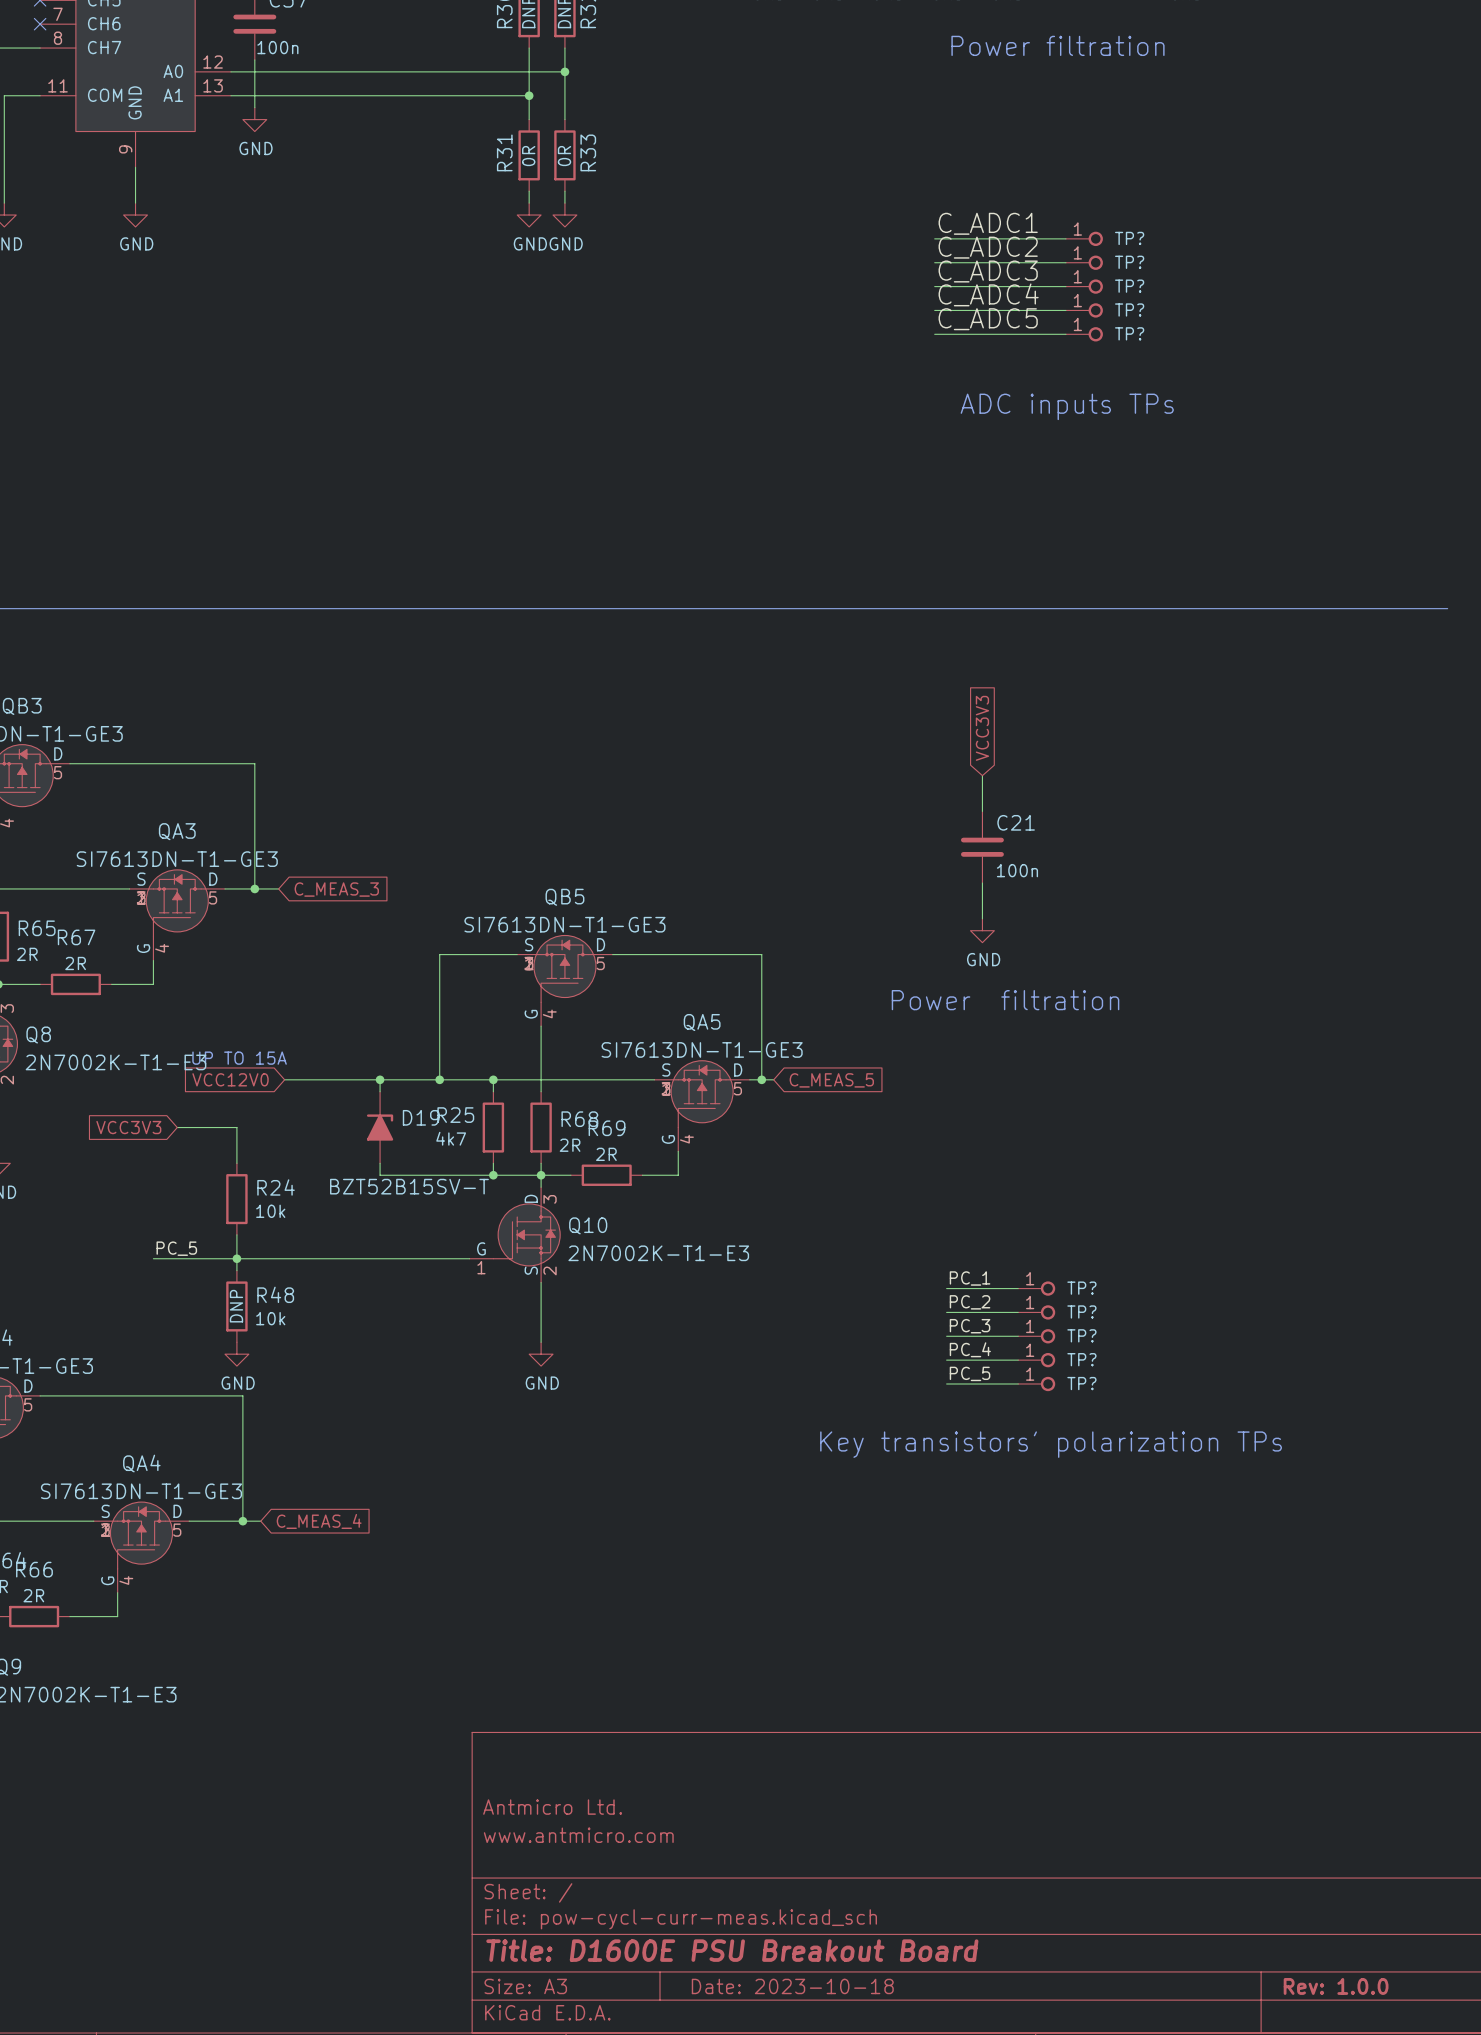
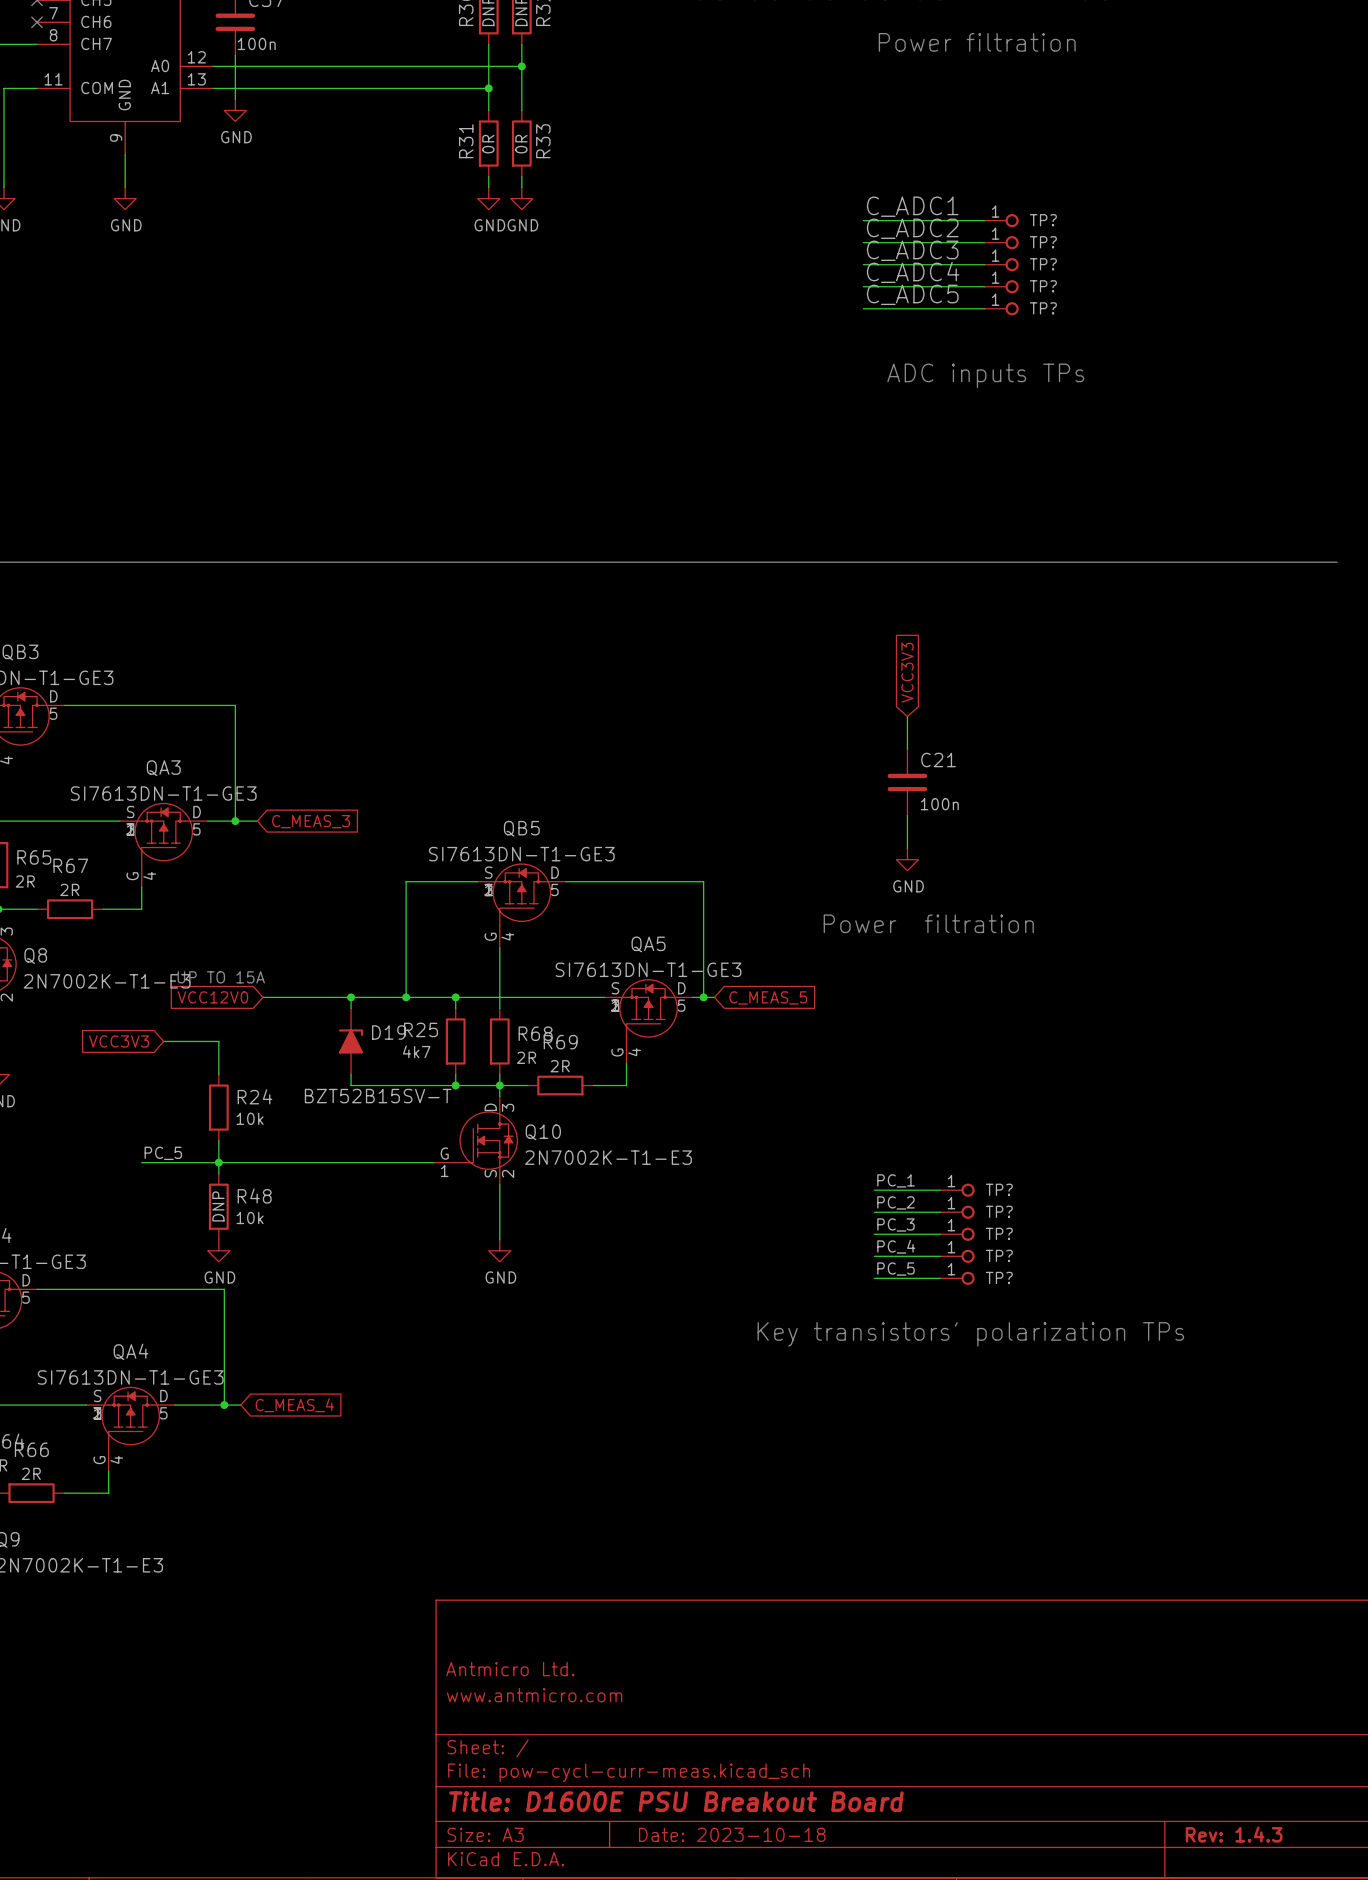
title block: Rev: 1.0.0 (1336, 1986) -> Rev: 1.4.3 (1234, 1834)

